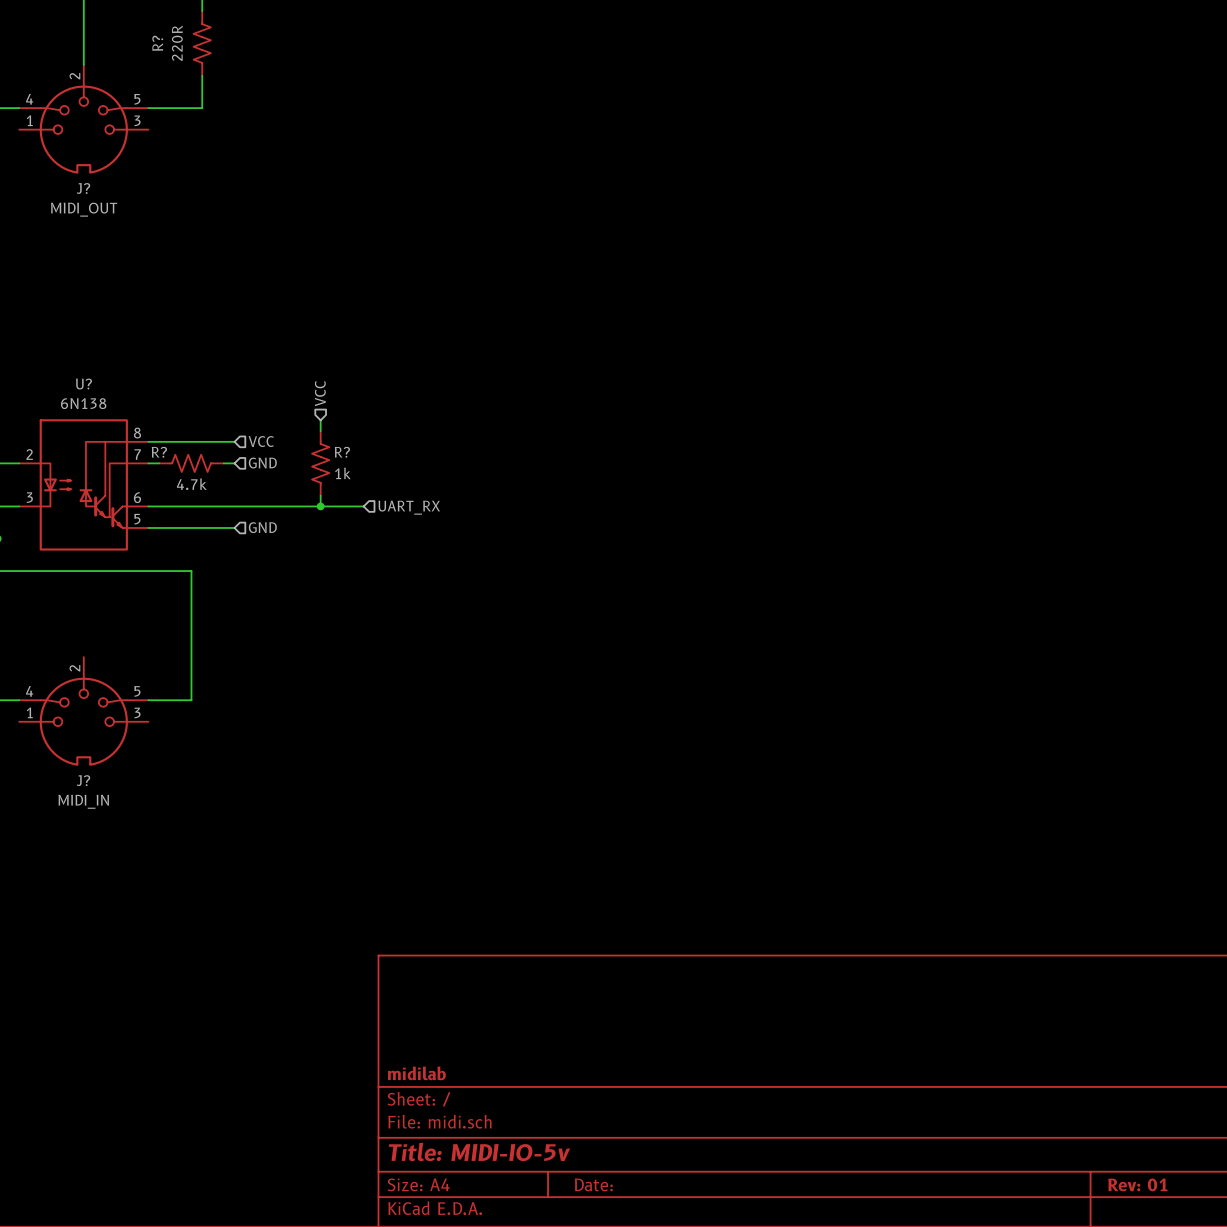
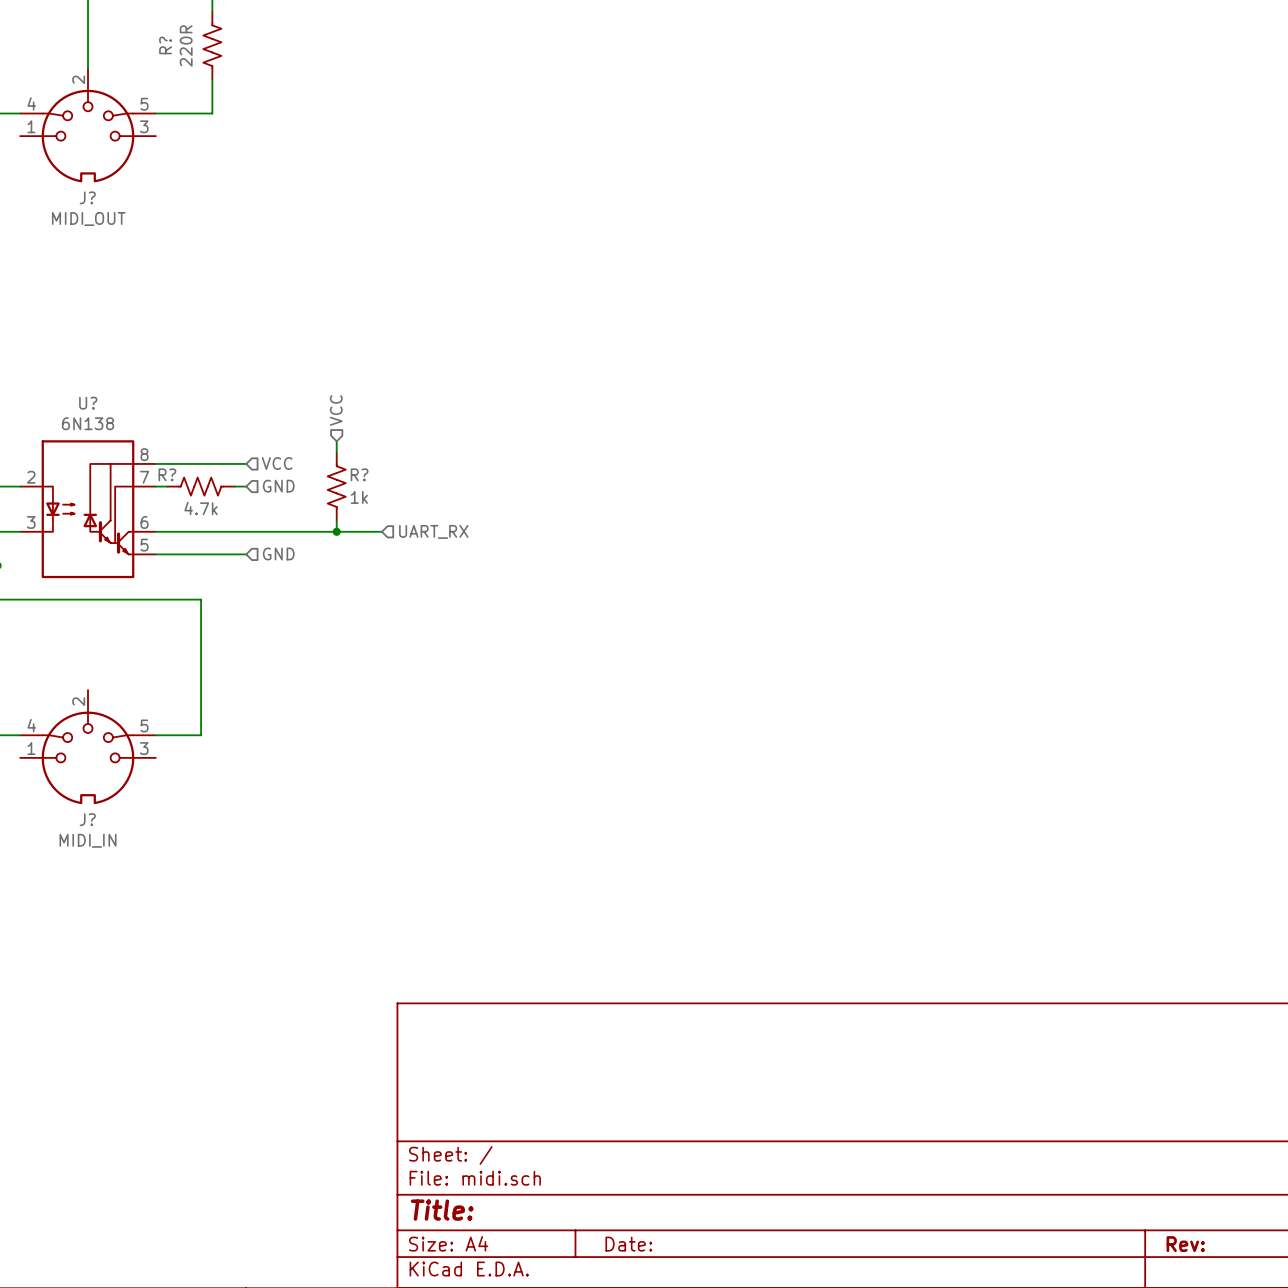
title block: midilab (416, 1073) -> none
title block: Title: MIDI-IO-5v (479, 1151) -> Title: (442, 1210)
title block: Rev: 01 (1137, 1184) -> Rev: (1185, 1244)

